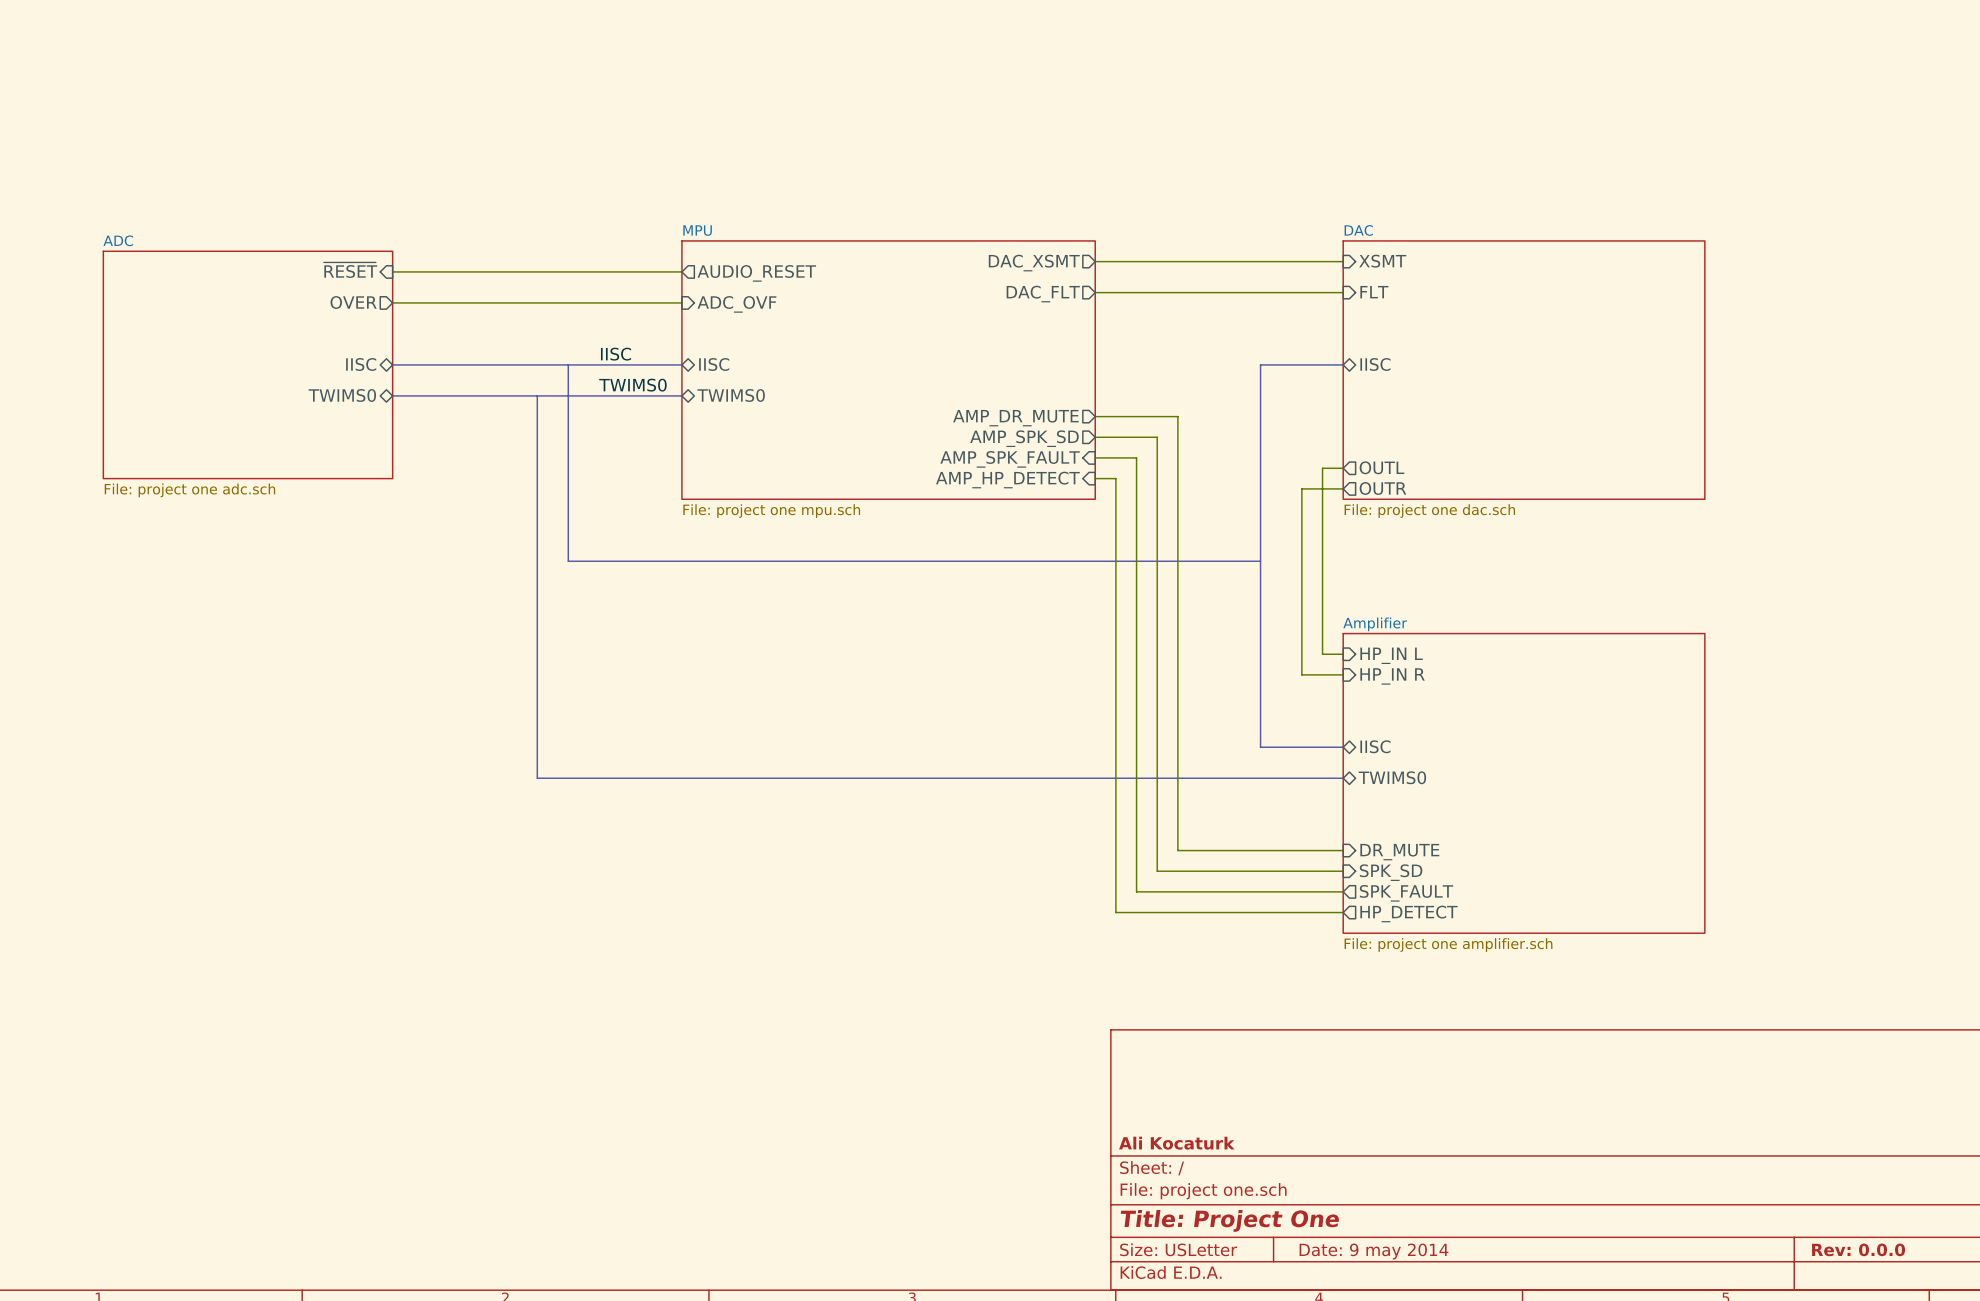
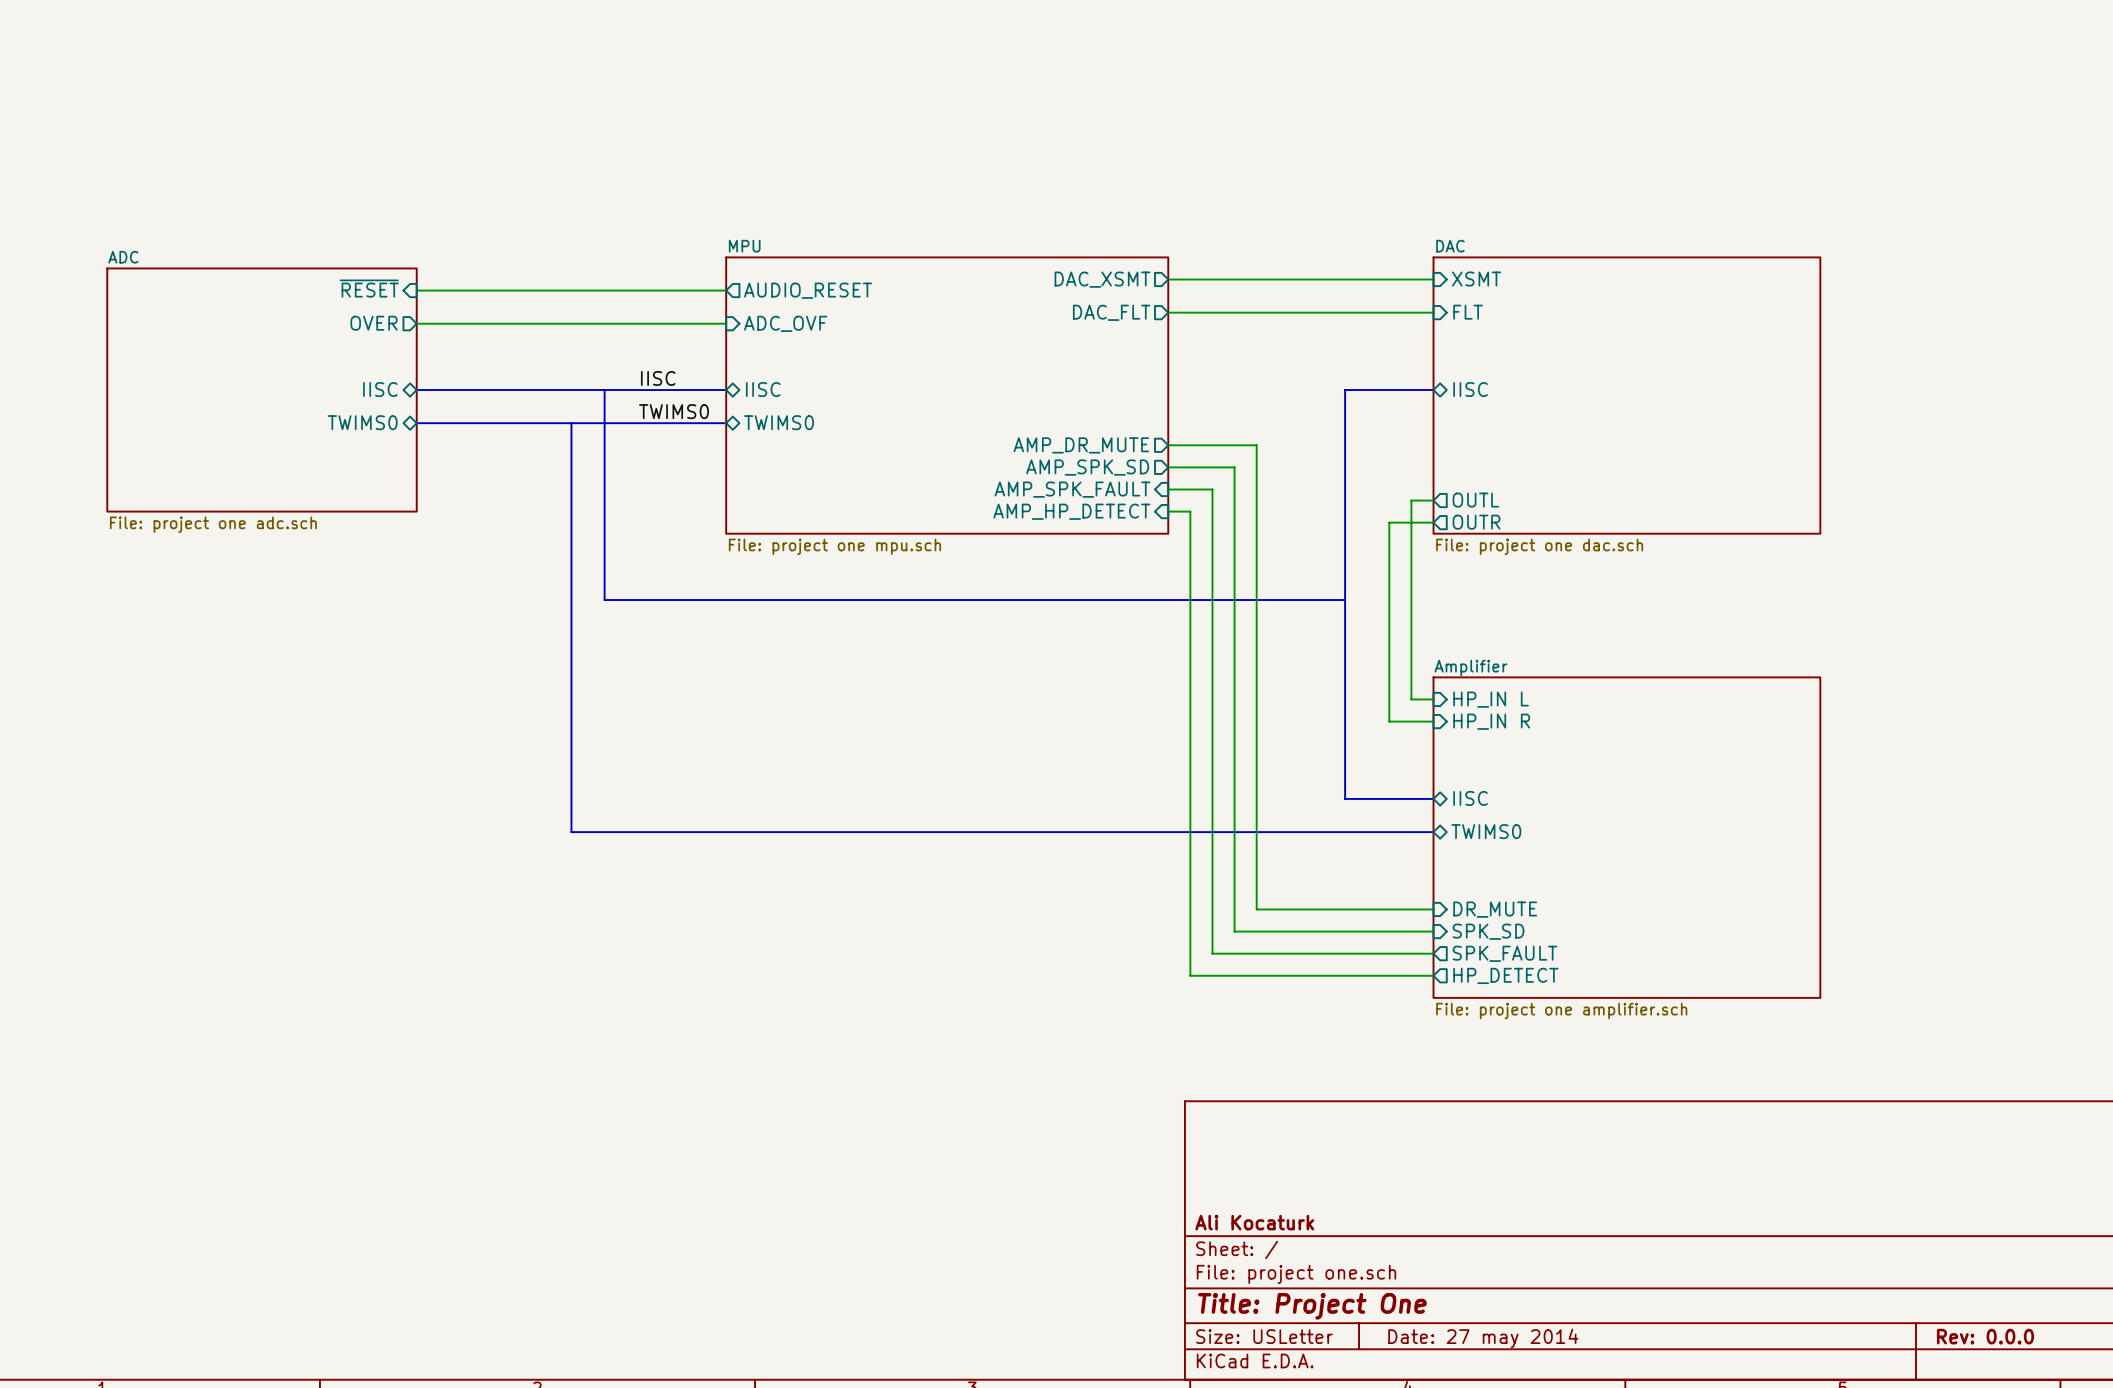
title block: Date: 9 may 2014 (1373, 1251) -> Date: 27 may 2014 (1483, 1338)

